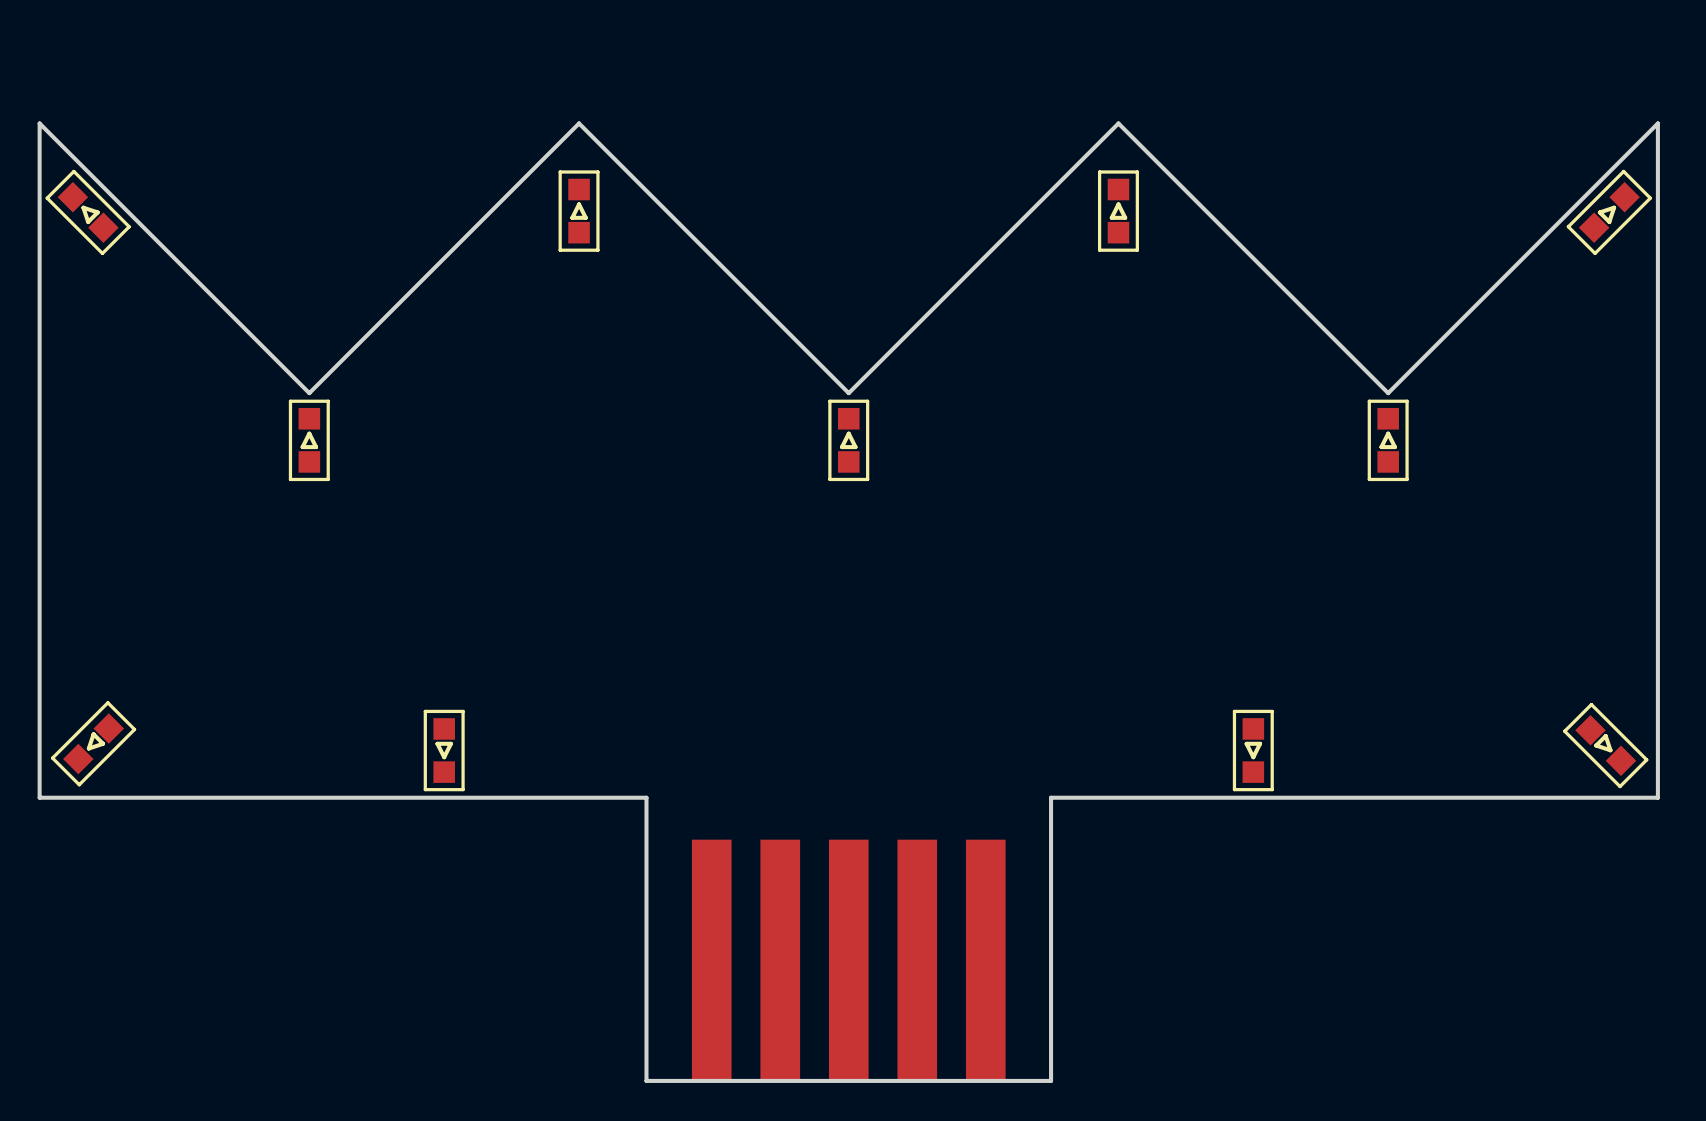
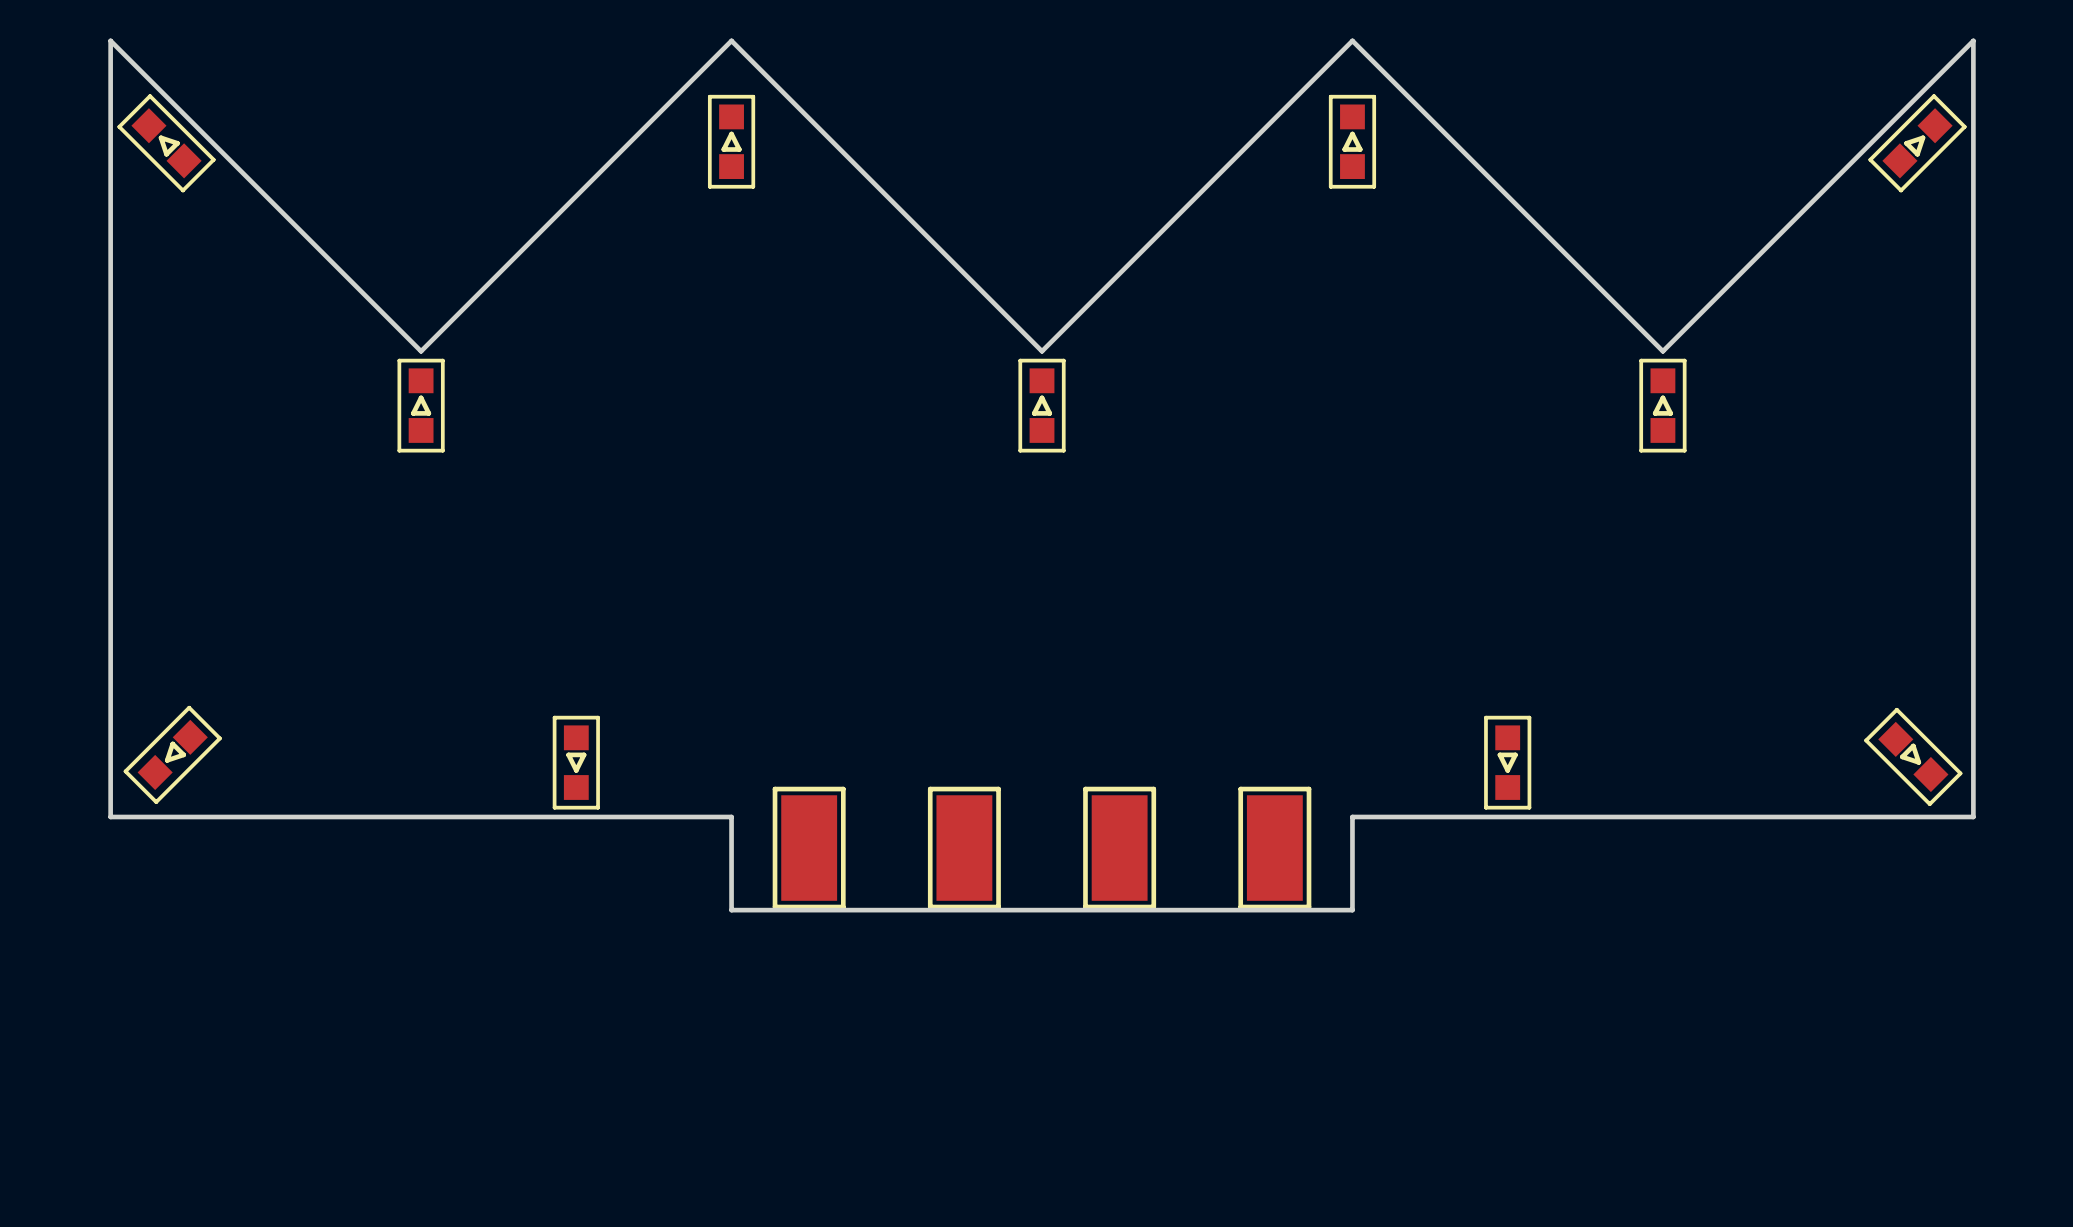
board edge: (579, 797) (646, 797) (646, 1080) (1051, 1080) (1051, 797) (1118, 797) -> (731, 816) (731, 910) (1352, 910) (1352, 816)
part: none -> (809, 848)
part: none -> (964, 848)
part: none -> (1119, 848)
part: none -> (1274, 848)
part: (848, 959) -> none

